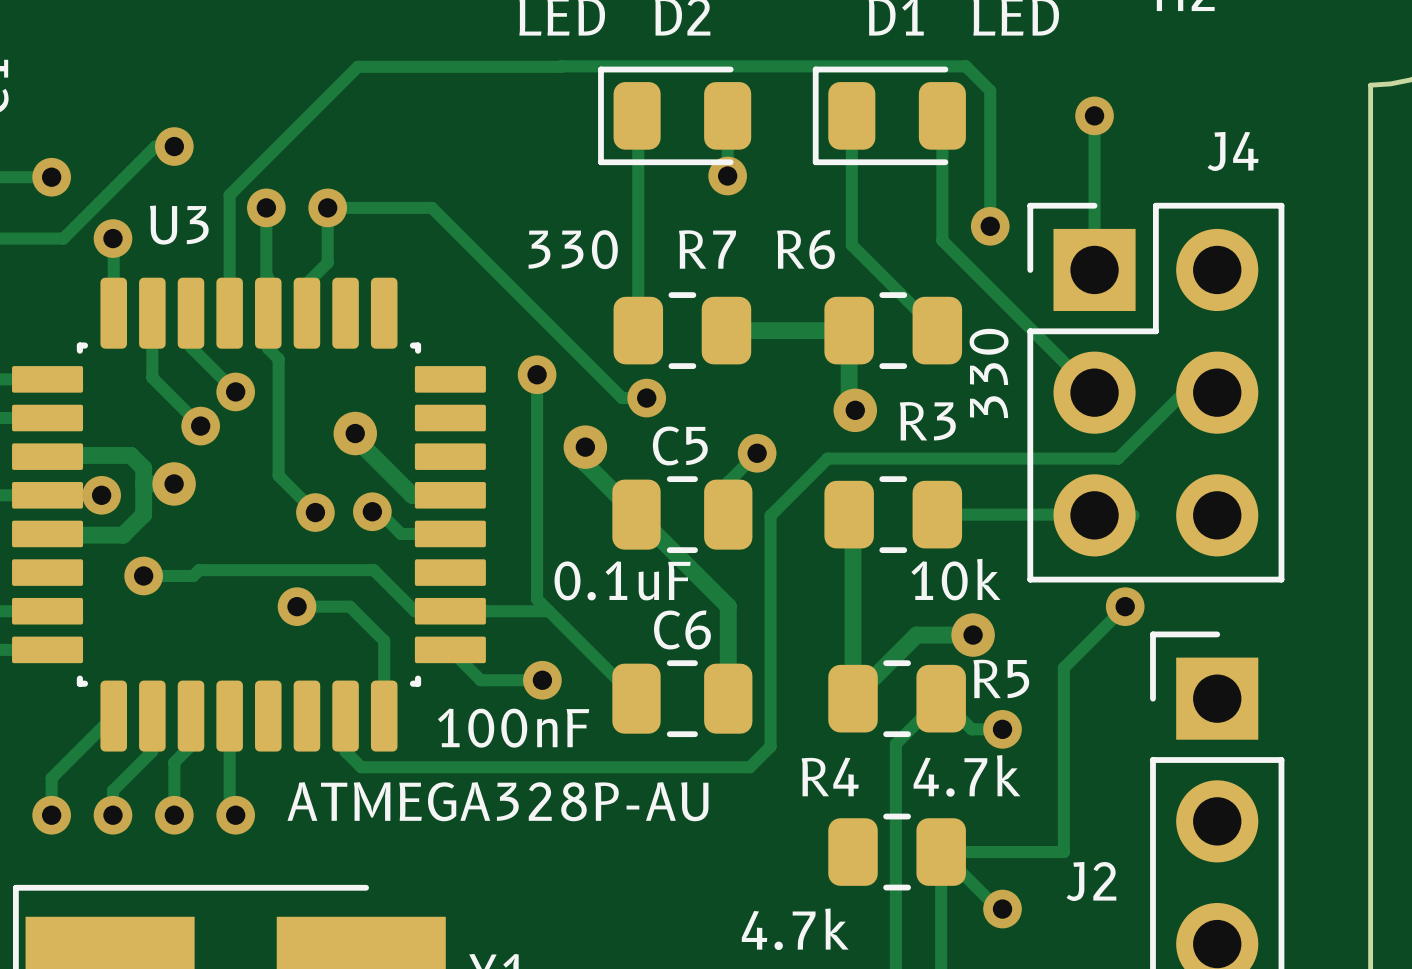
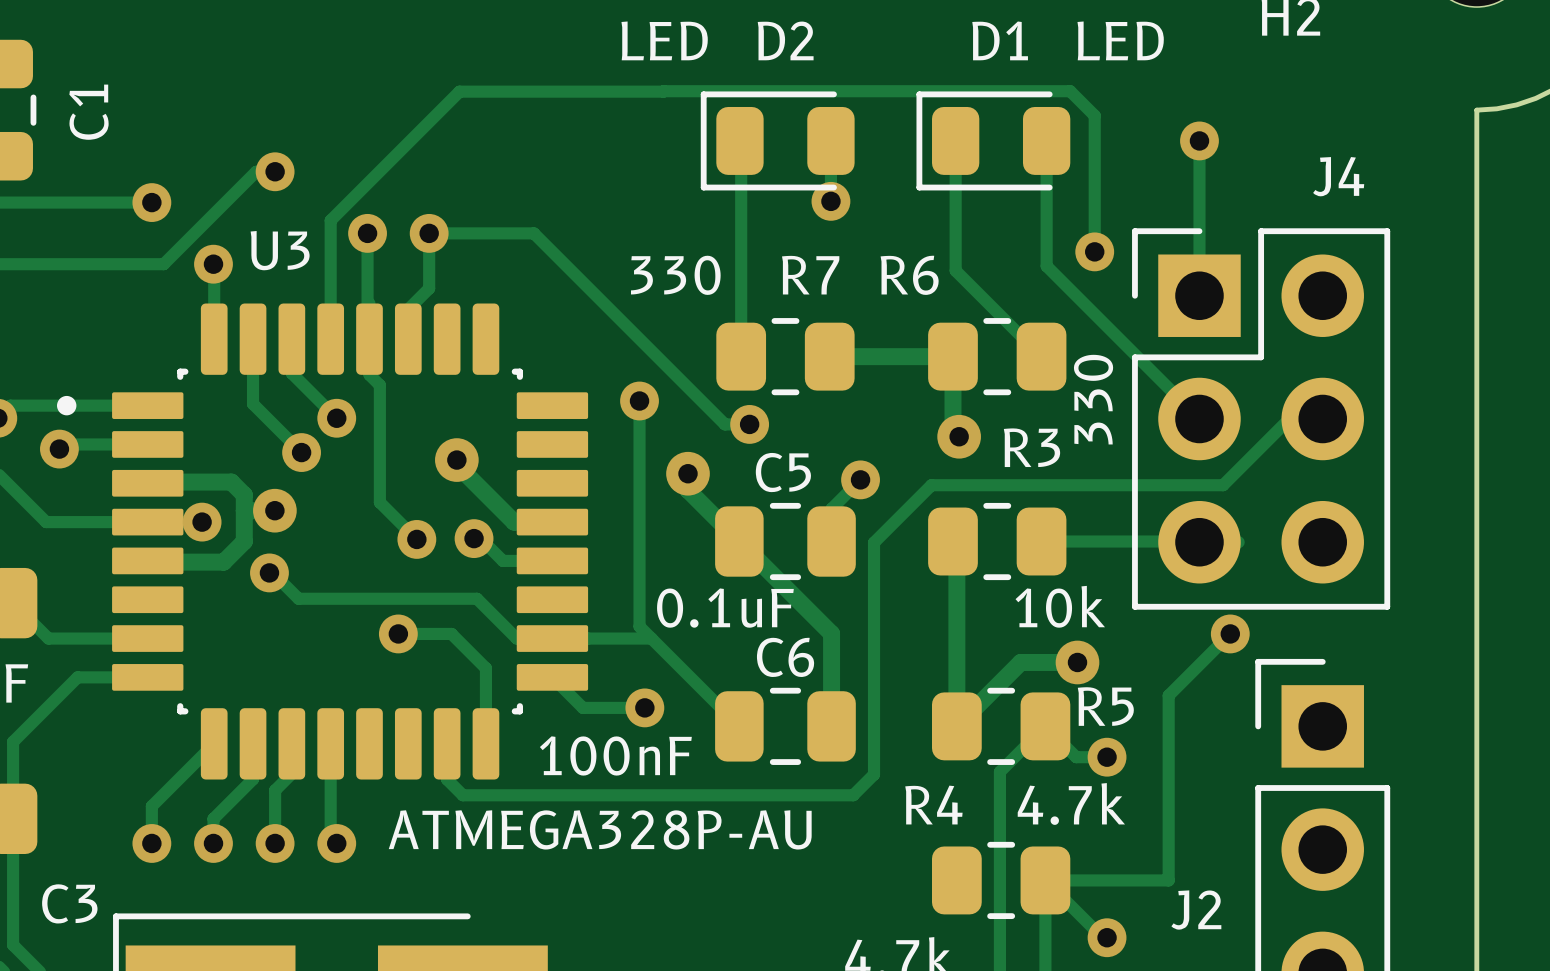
track: (375, 571) (199, 570) (193, 575) (143, 575) -> (476, 598) (298, 598) (272, 572) (269, 572)
via position: (143, 575) -> (269, 572)

